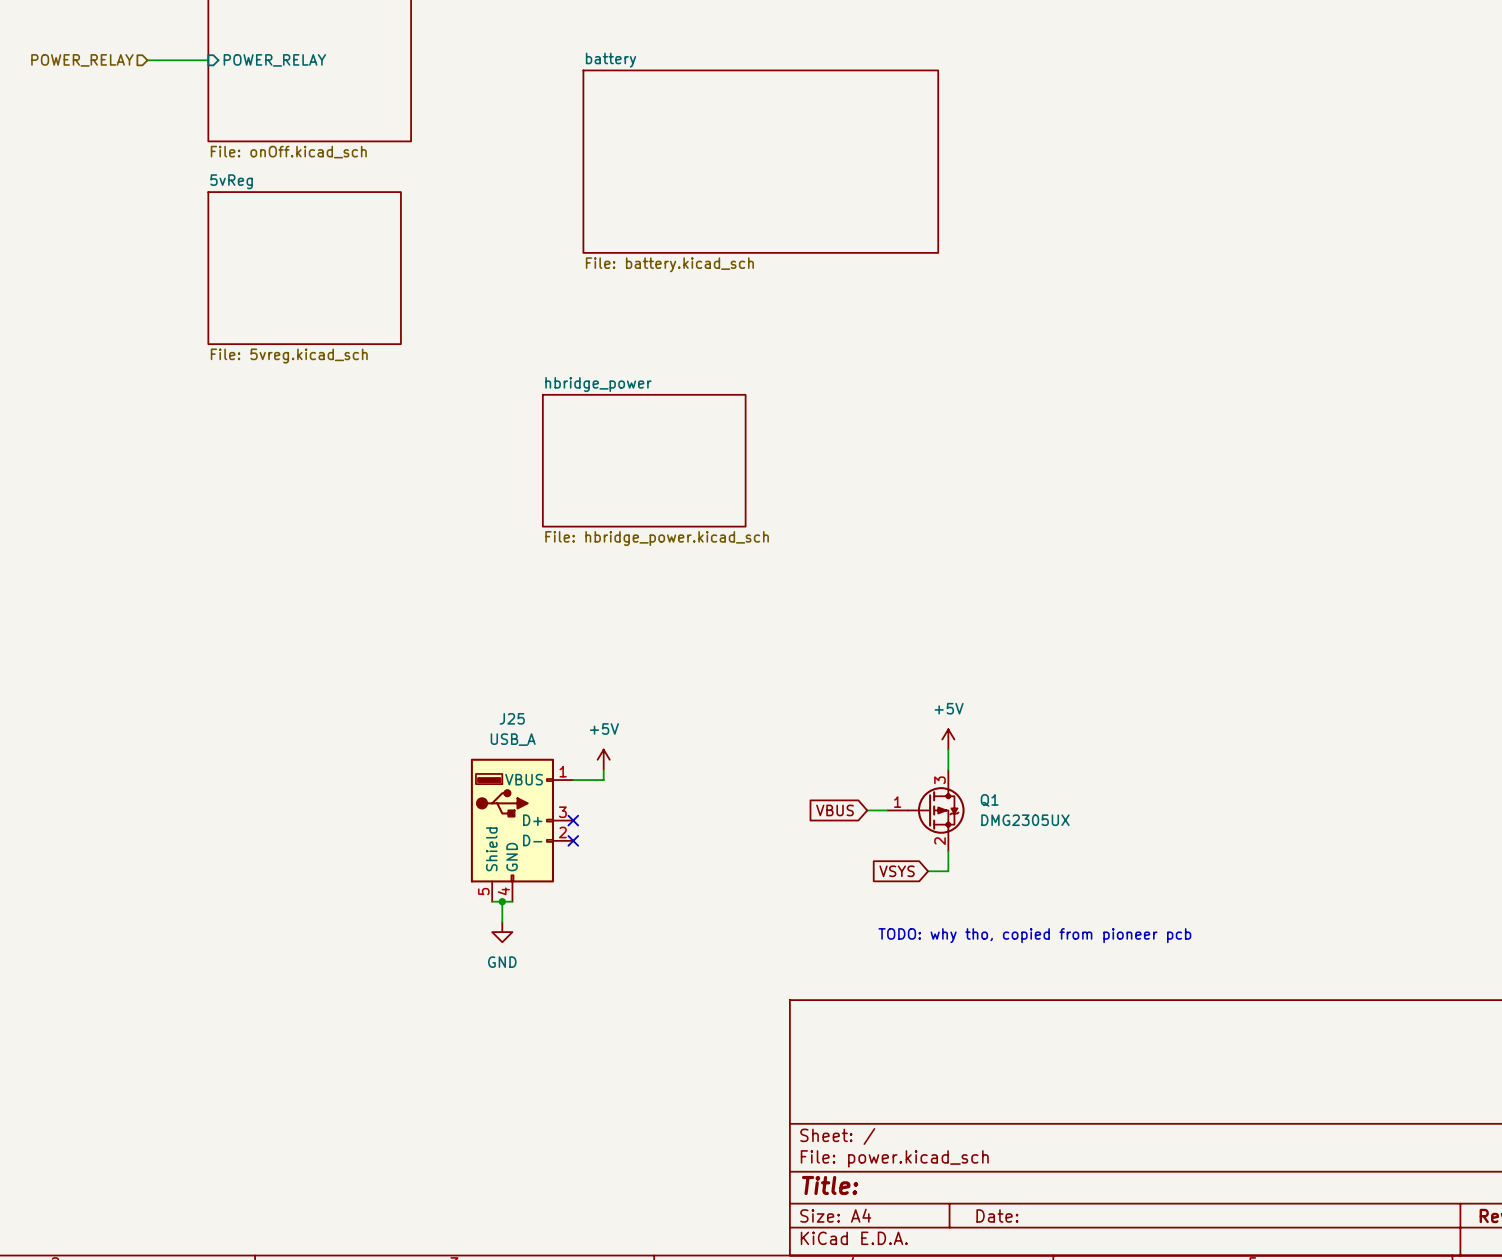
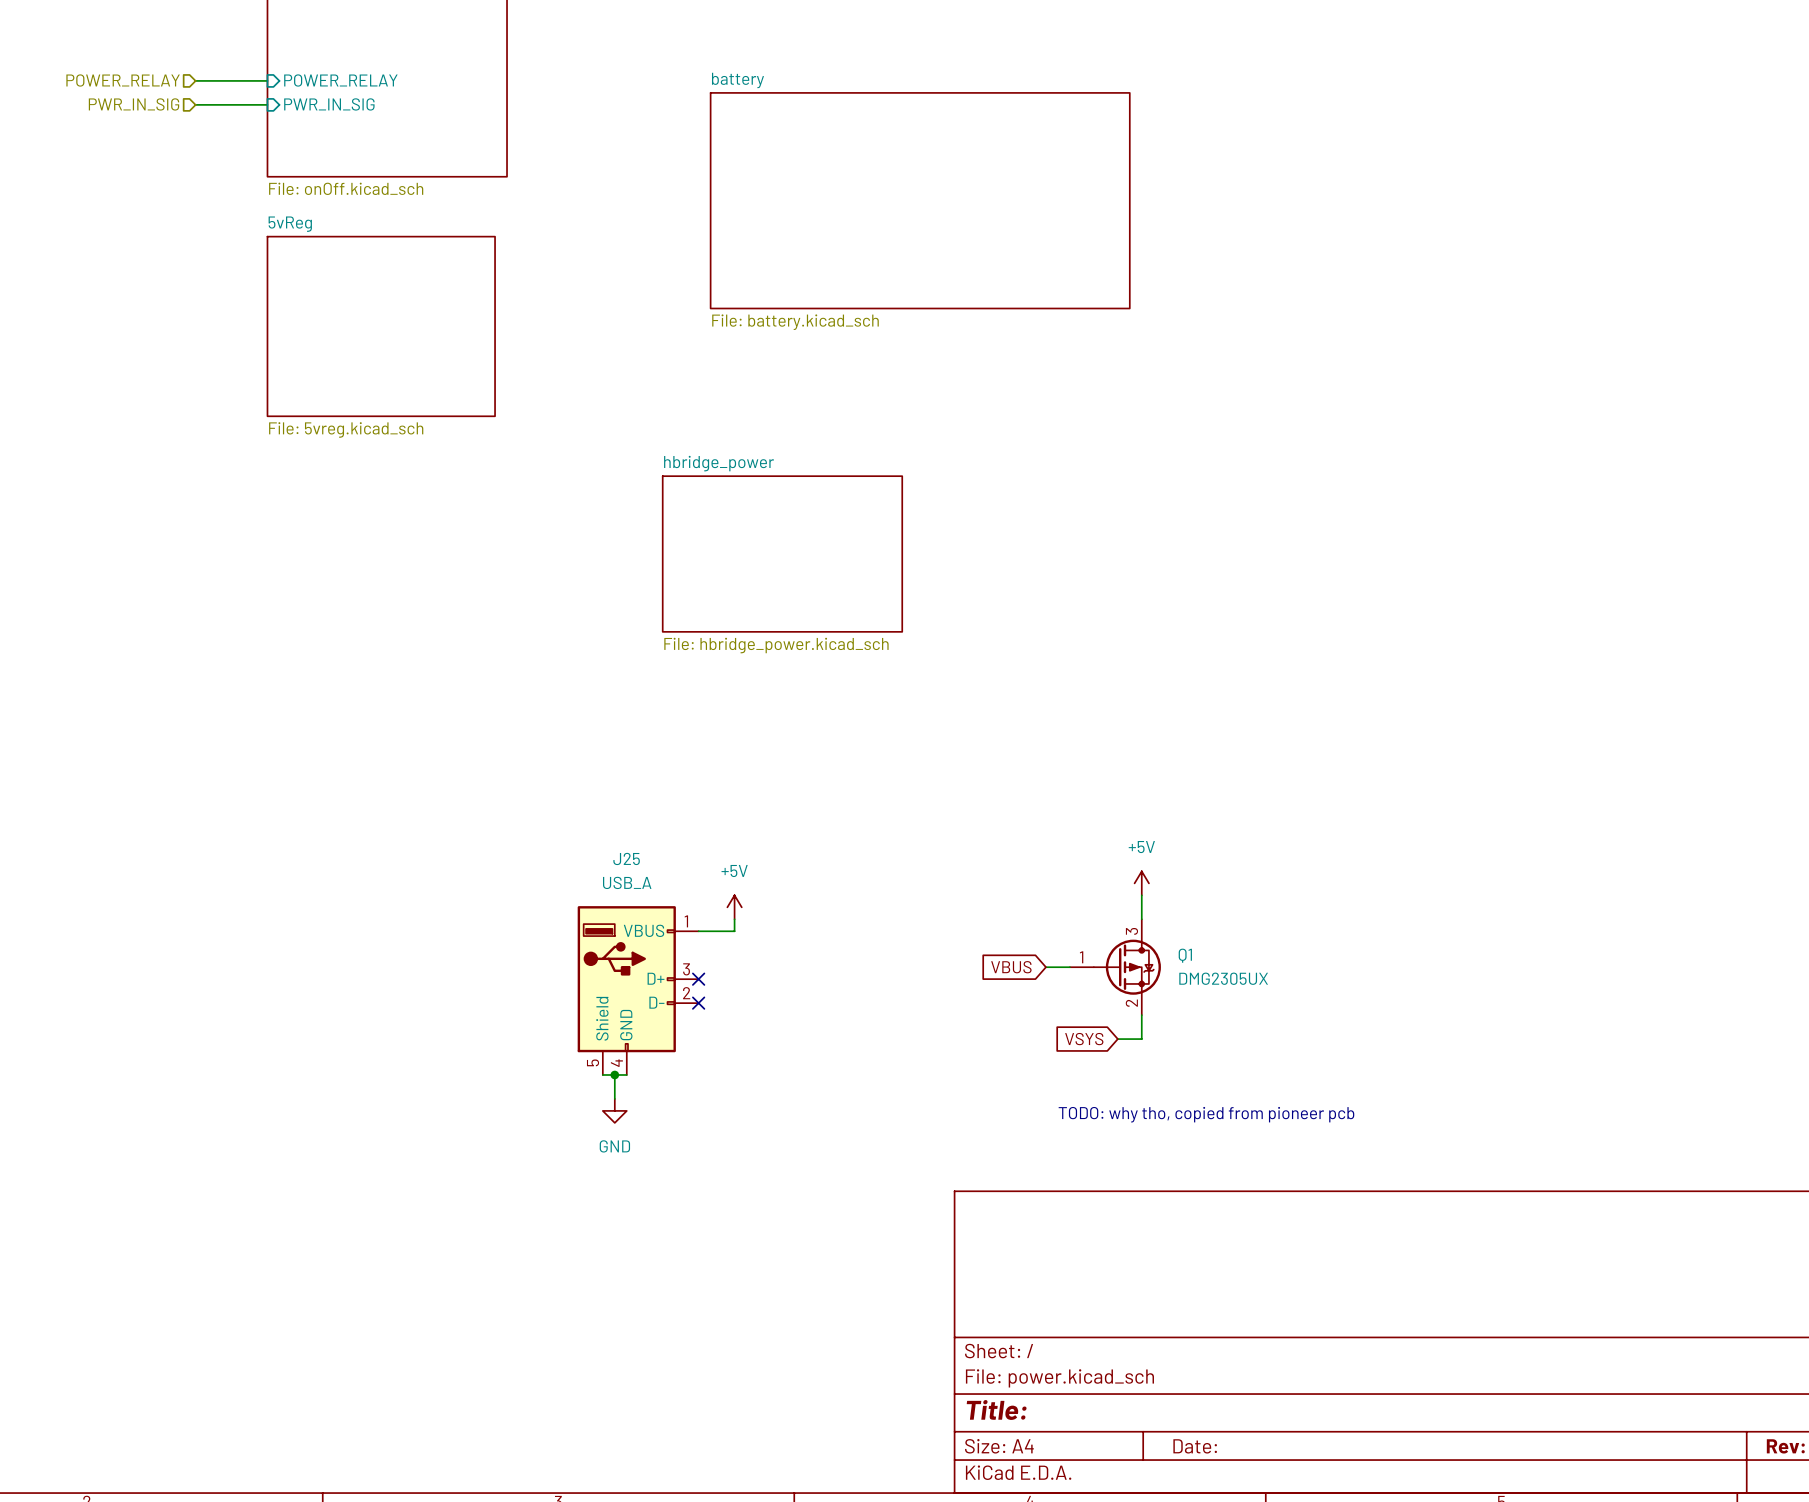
hierarchical label: none -> PWR_IN_SIG (133, 104)
wire: none -> (195, 104) (267, 104)
sheet pin: none -> PWR_IN_SIG (329, 104)

